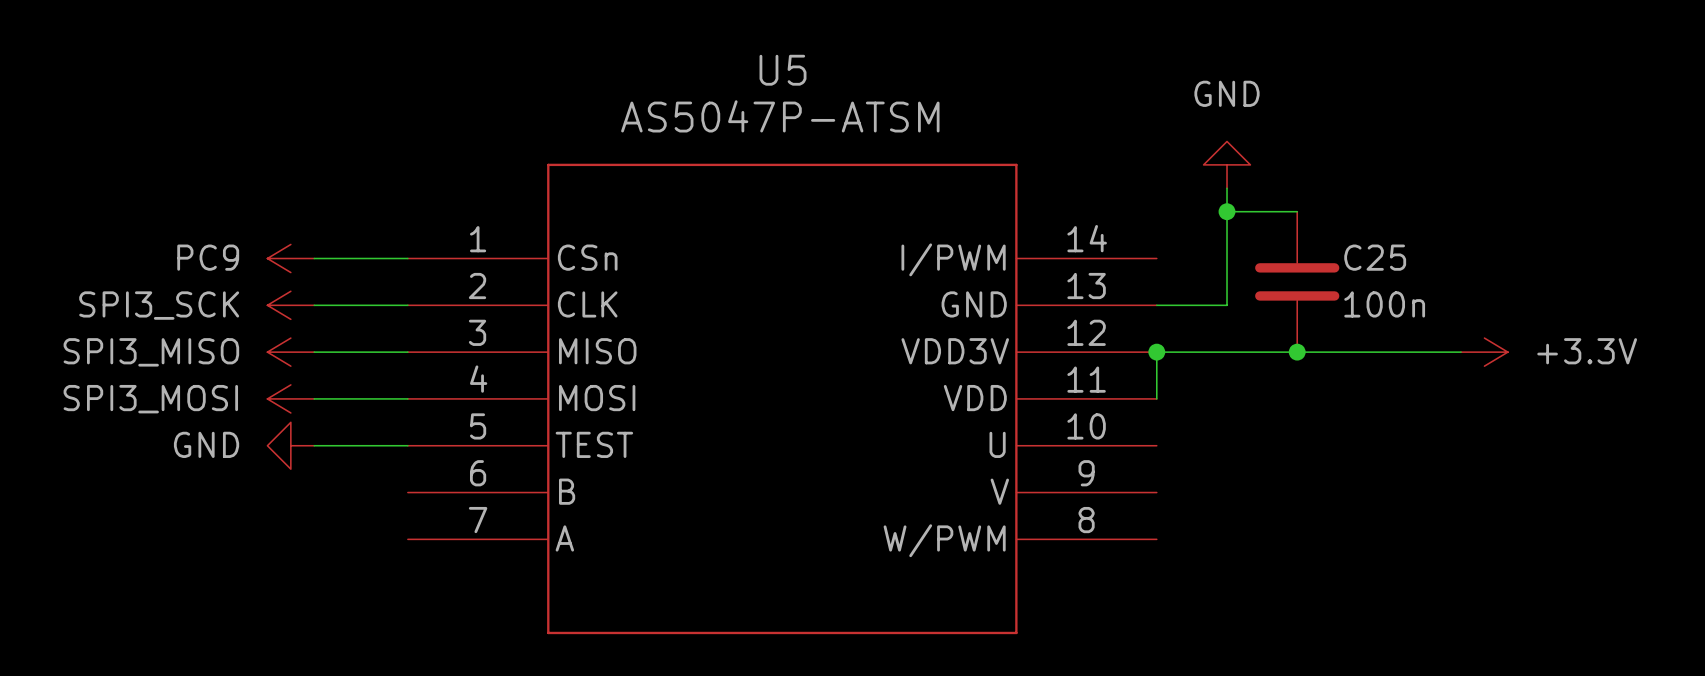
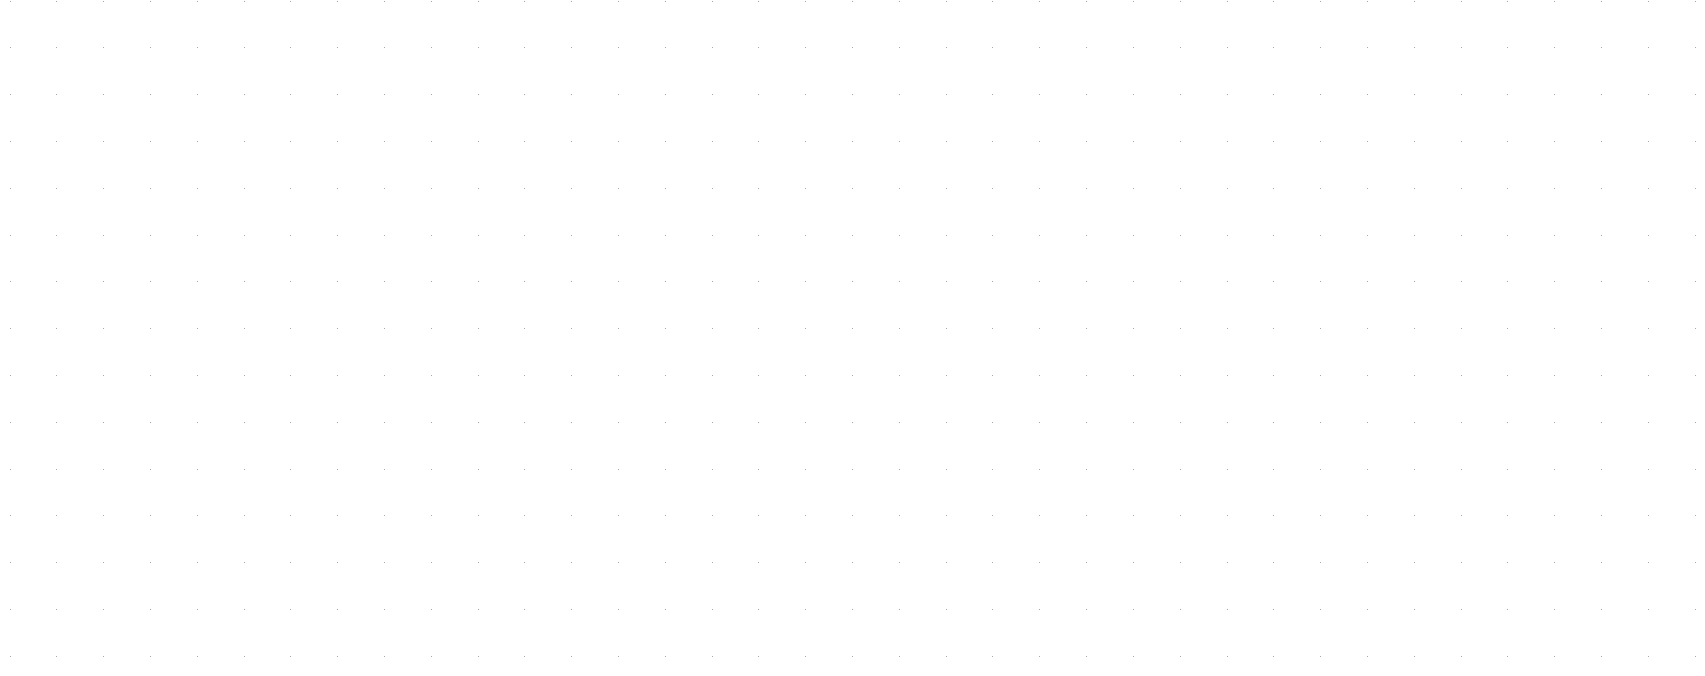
power symbol: GND (1227, 164) -> none
wire: (1227, 188) (1227, 305) (1156, 305) -> none
wire: (1227, 211) (1297, 211) -> none
junction: (1227, 211) -> none
power symbol: PC9 (290, 258) -> none
wire: (314, 258) (407, 258) -> none
C25: 100n (1297, 281) -> none
power symbol: SPI3_SCK (290, 305) -> none
wire: (314, 305) (407, 305) -> none
power symbol: SPI3_MISO (290, 352) -> none
wire: (314, 352) (407, 352) -> none
junction: (1156, 352) -> none
junction: (1297, 352) -> none
wire: (1461, 352) (1156, 352) (1156, 398) -> none
power symbol: +3.3V (1484, 352) -> none
power symbol: SPI3_MOSI (290, 398) -> none
wire: (314, 398) (407, 398) -> none
U5: AS5047P-ATSM (782, 398) -> none
power symbol: GND (290, 445) -> none
wire: (314, 445) (407, 445) -> none

